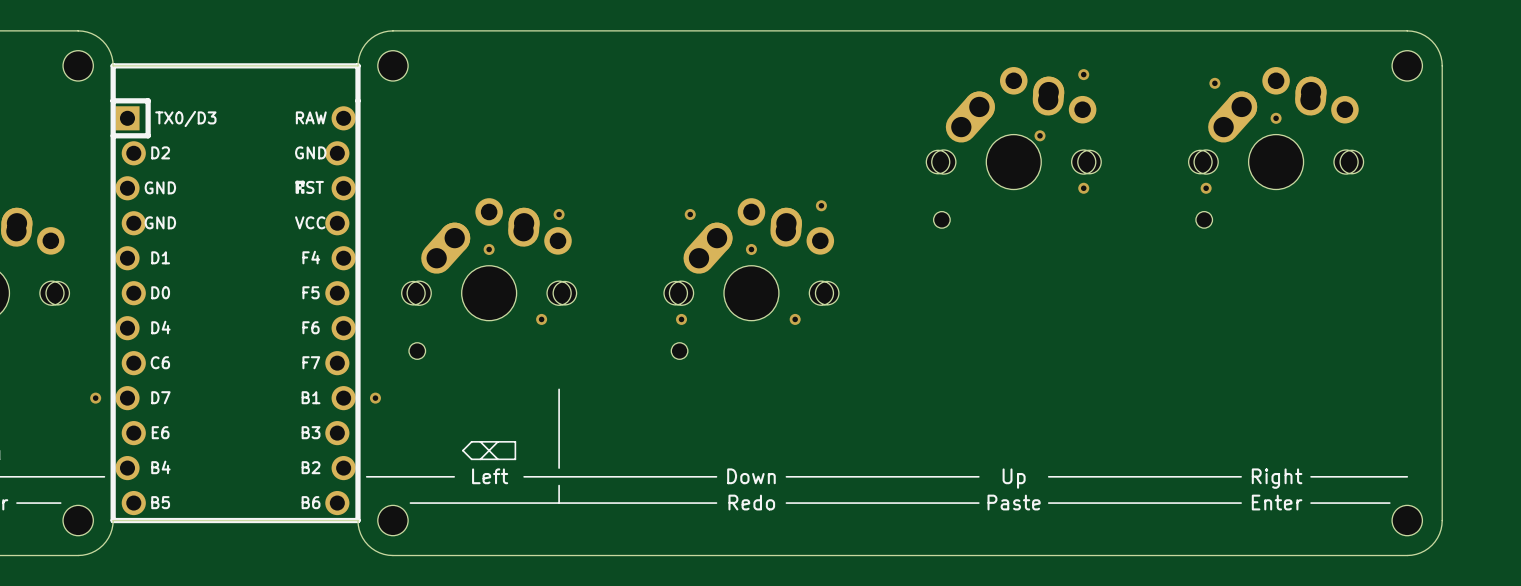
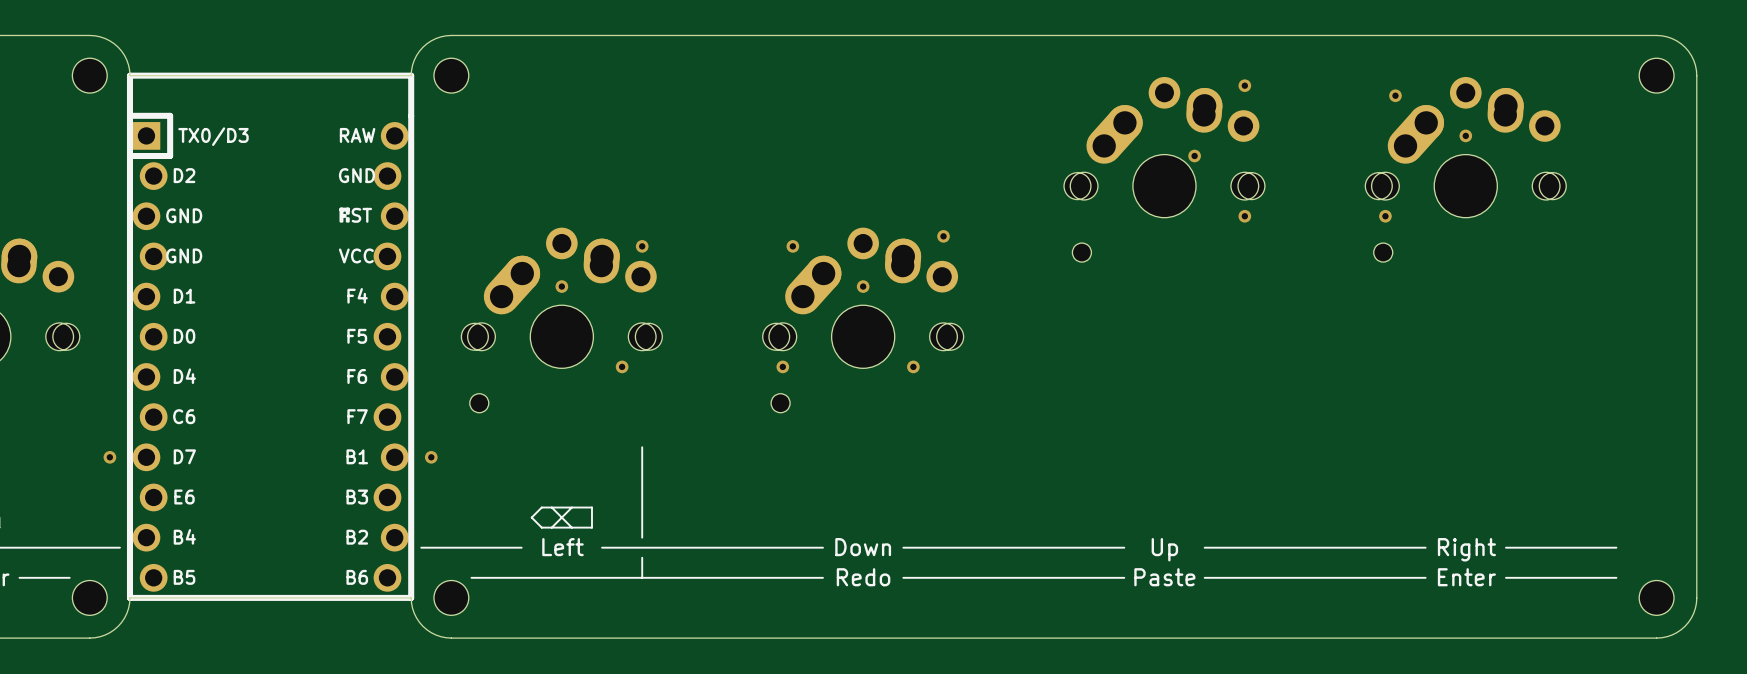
board edge: (1407, 30) (1420, 33) (1431, 41) (1439, 52) (1442, 65) (1441, 525) (1437, 538) (1428, 548) (1416, 554) (1407, 555) -> (1616, 35) (1661, 35) (1676, 40) (1691, 55) (1696, 75) (1696, 603) (1688, 622) (1671, 635) (1656, 638) (1616, 638)
part position: (1407, 65) -> (1656, 75)
line: none -> (1596, 577) (1616, 577)
part position: (1407, 520) -> (1656, 597)

